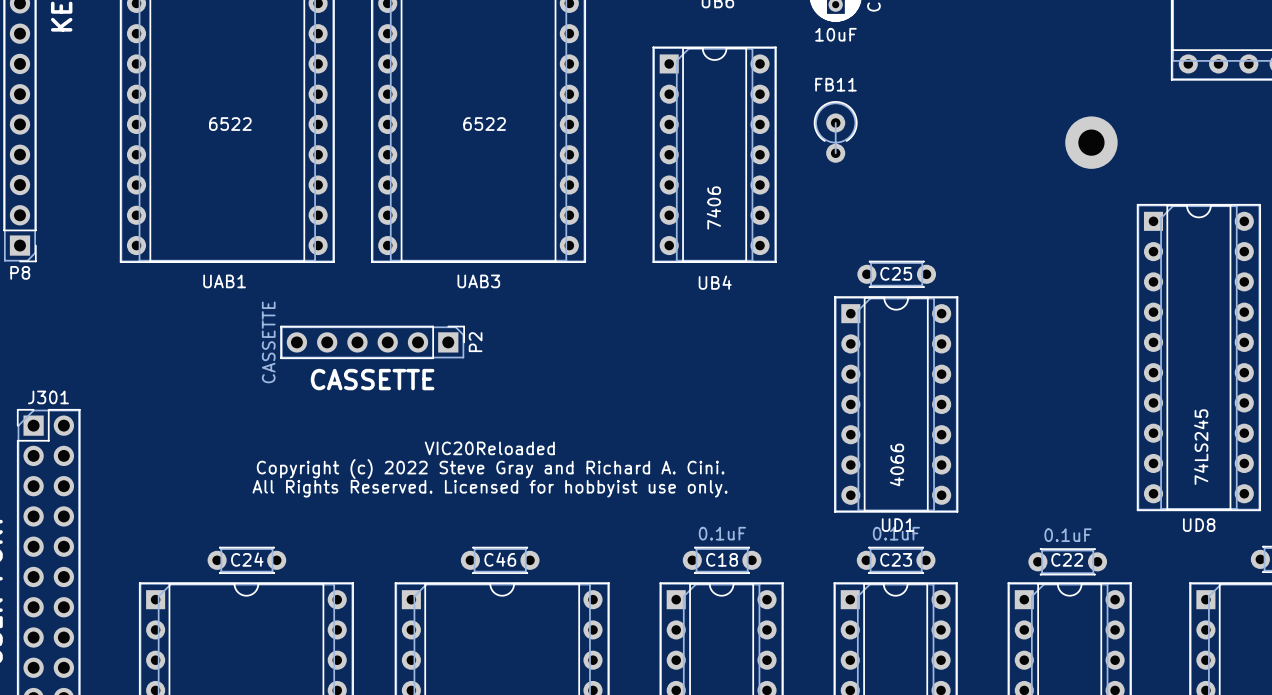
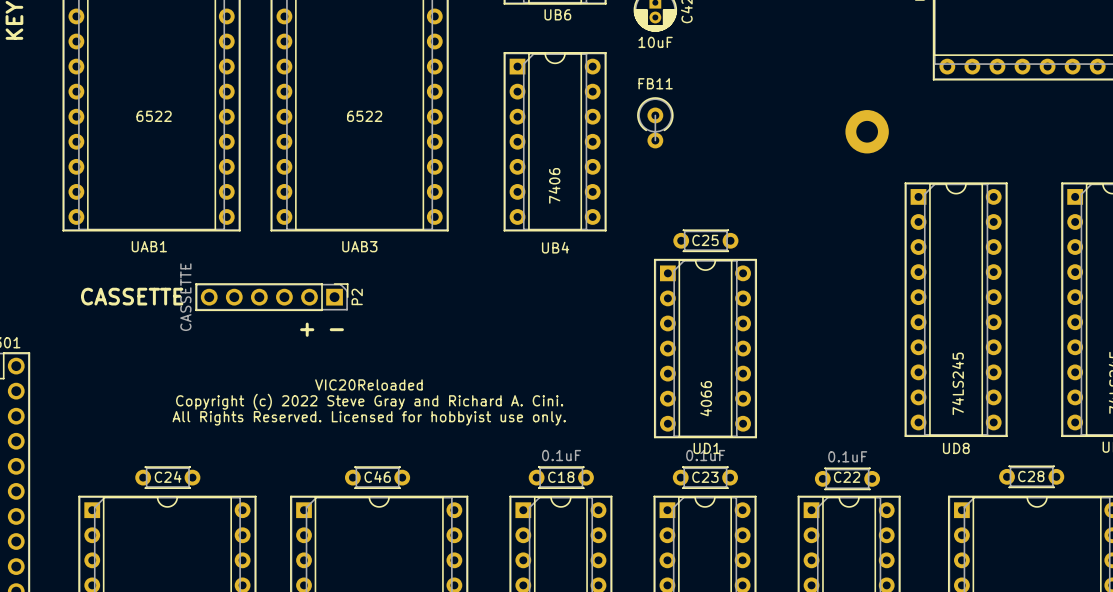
text position: CASSETTE (372, 379) -> CASSETTE (132, 296)
text: none -> + - (322, 329)

